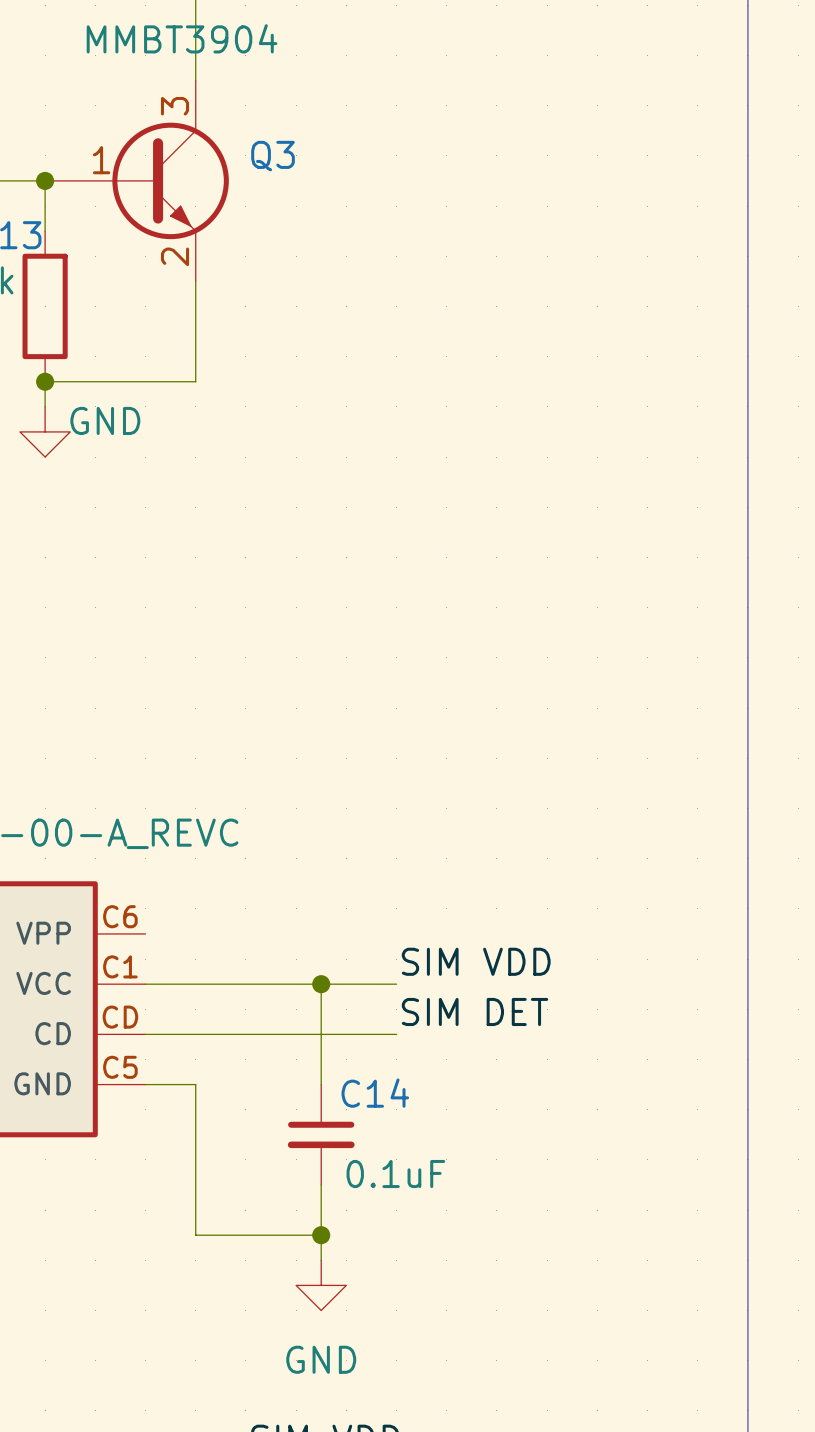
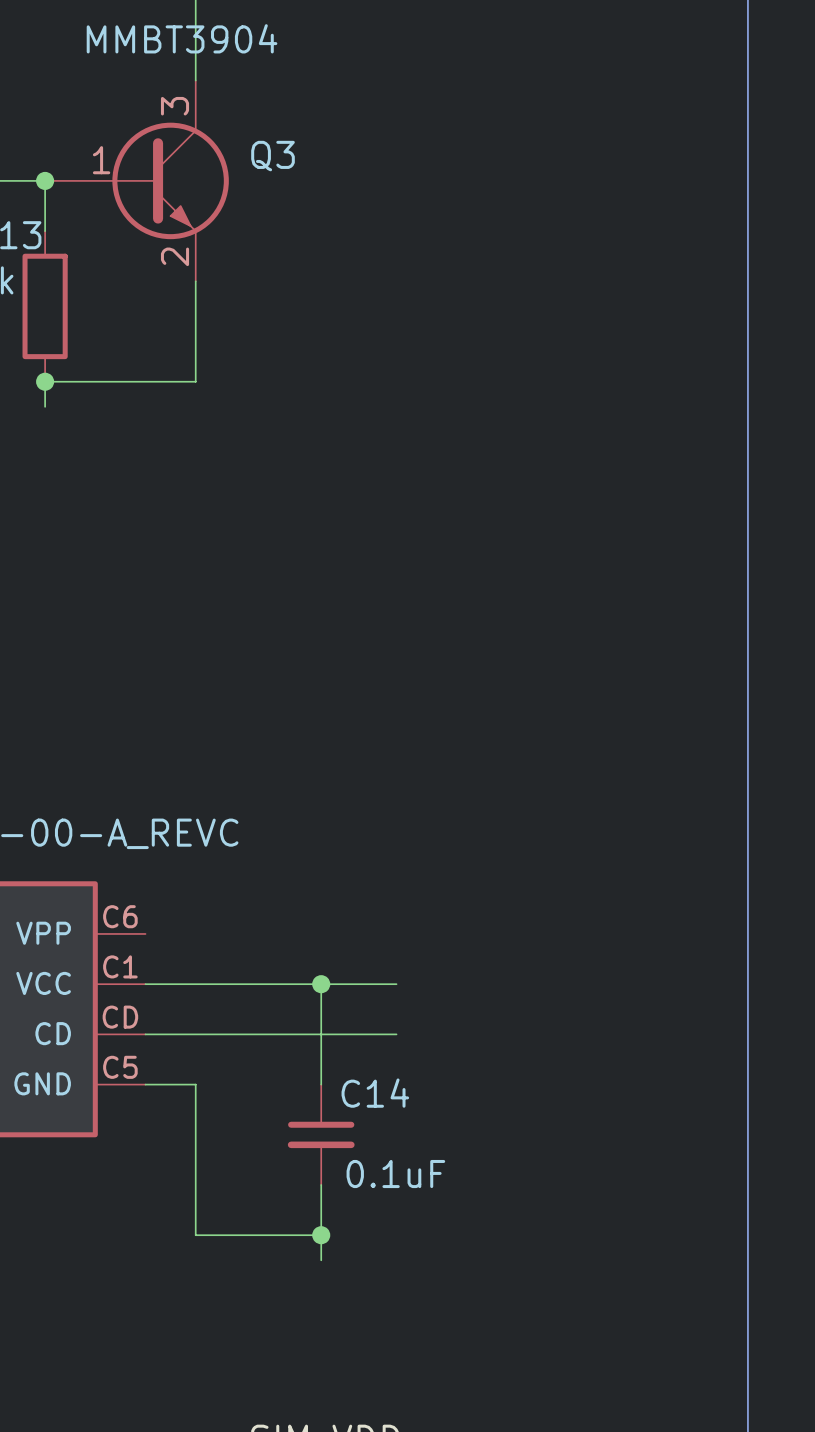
power symbol: GND (45, 431) -> none
label: SIM VDD (476, 961) -> none
label: SIM DET (475, 1011) -> none
power symbol: GND (321, 1285) -> none

